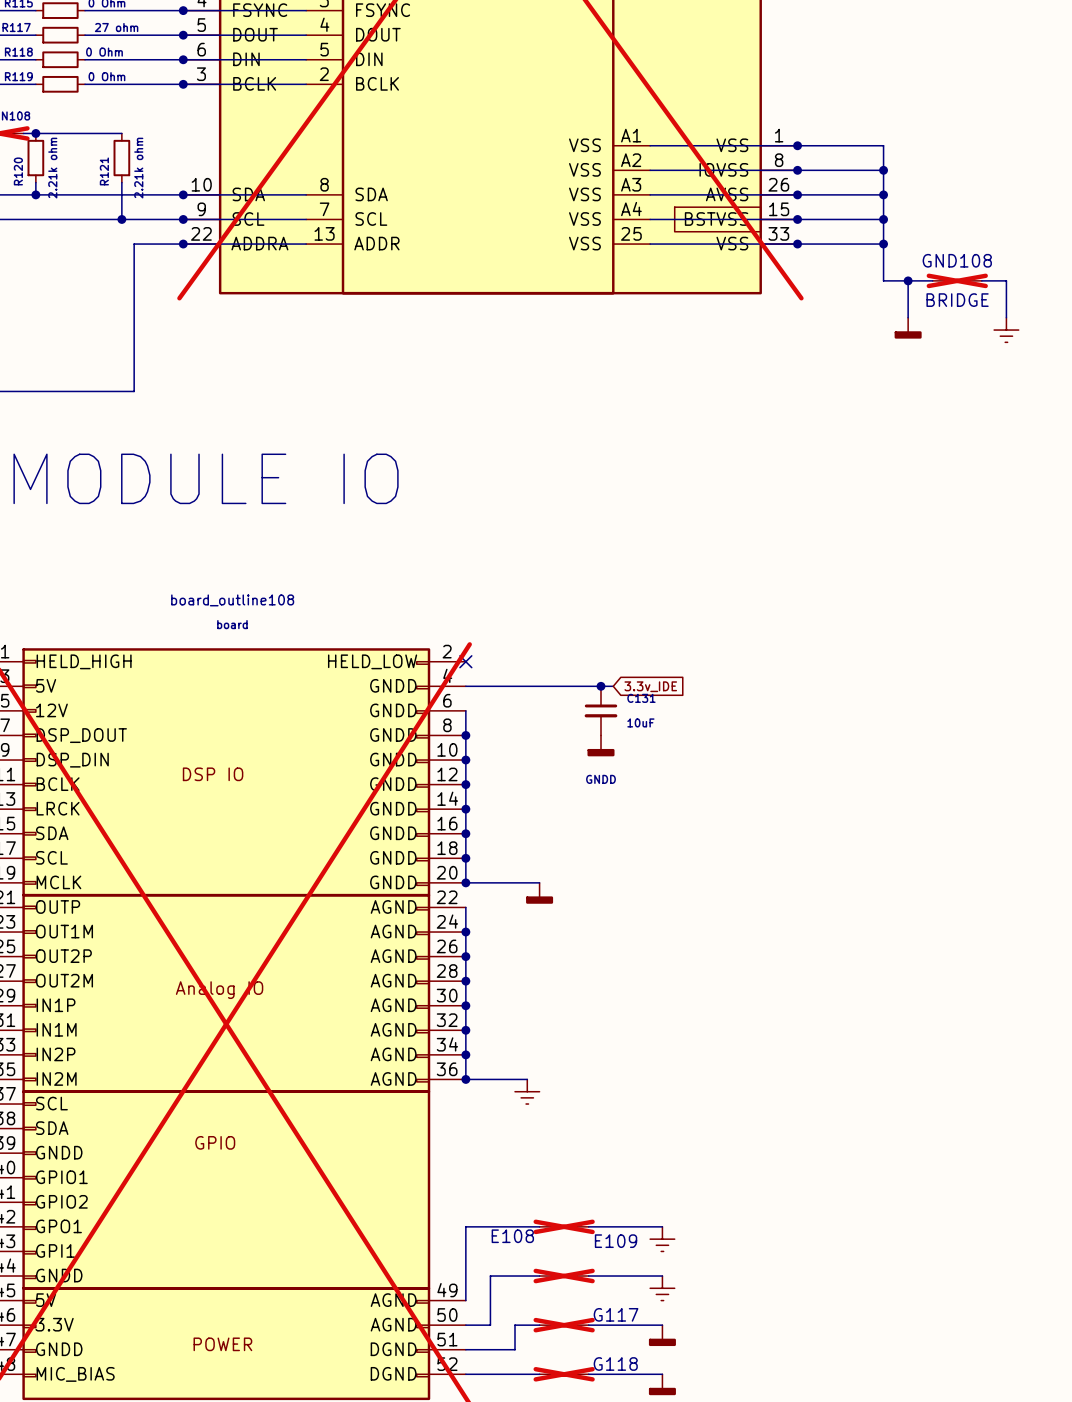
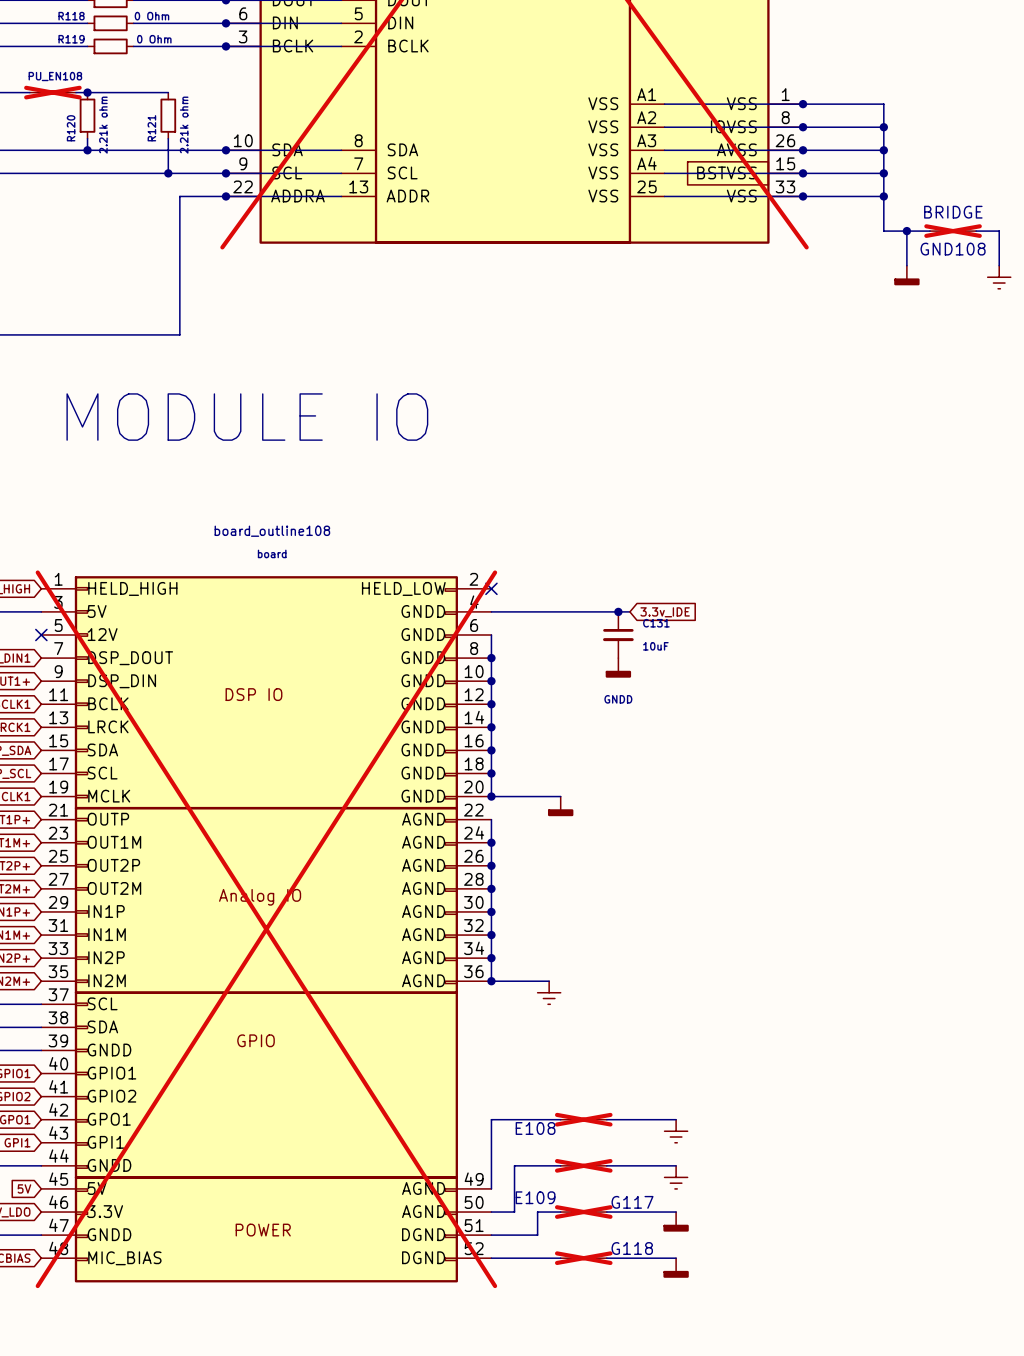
GND108 name position: GND108 (957, 260) -> GND108 (953, 249)
GND108 value position: BRIDGE (957, 300) -> BRIDGE (953, 212)
E109 name position: E109 (616, 1241) -> E109 (535, 1197)

